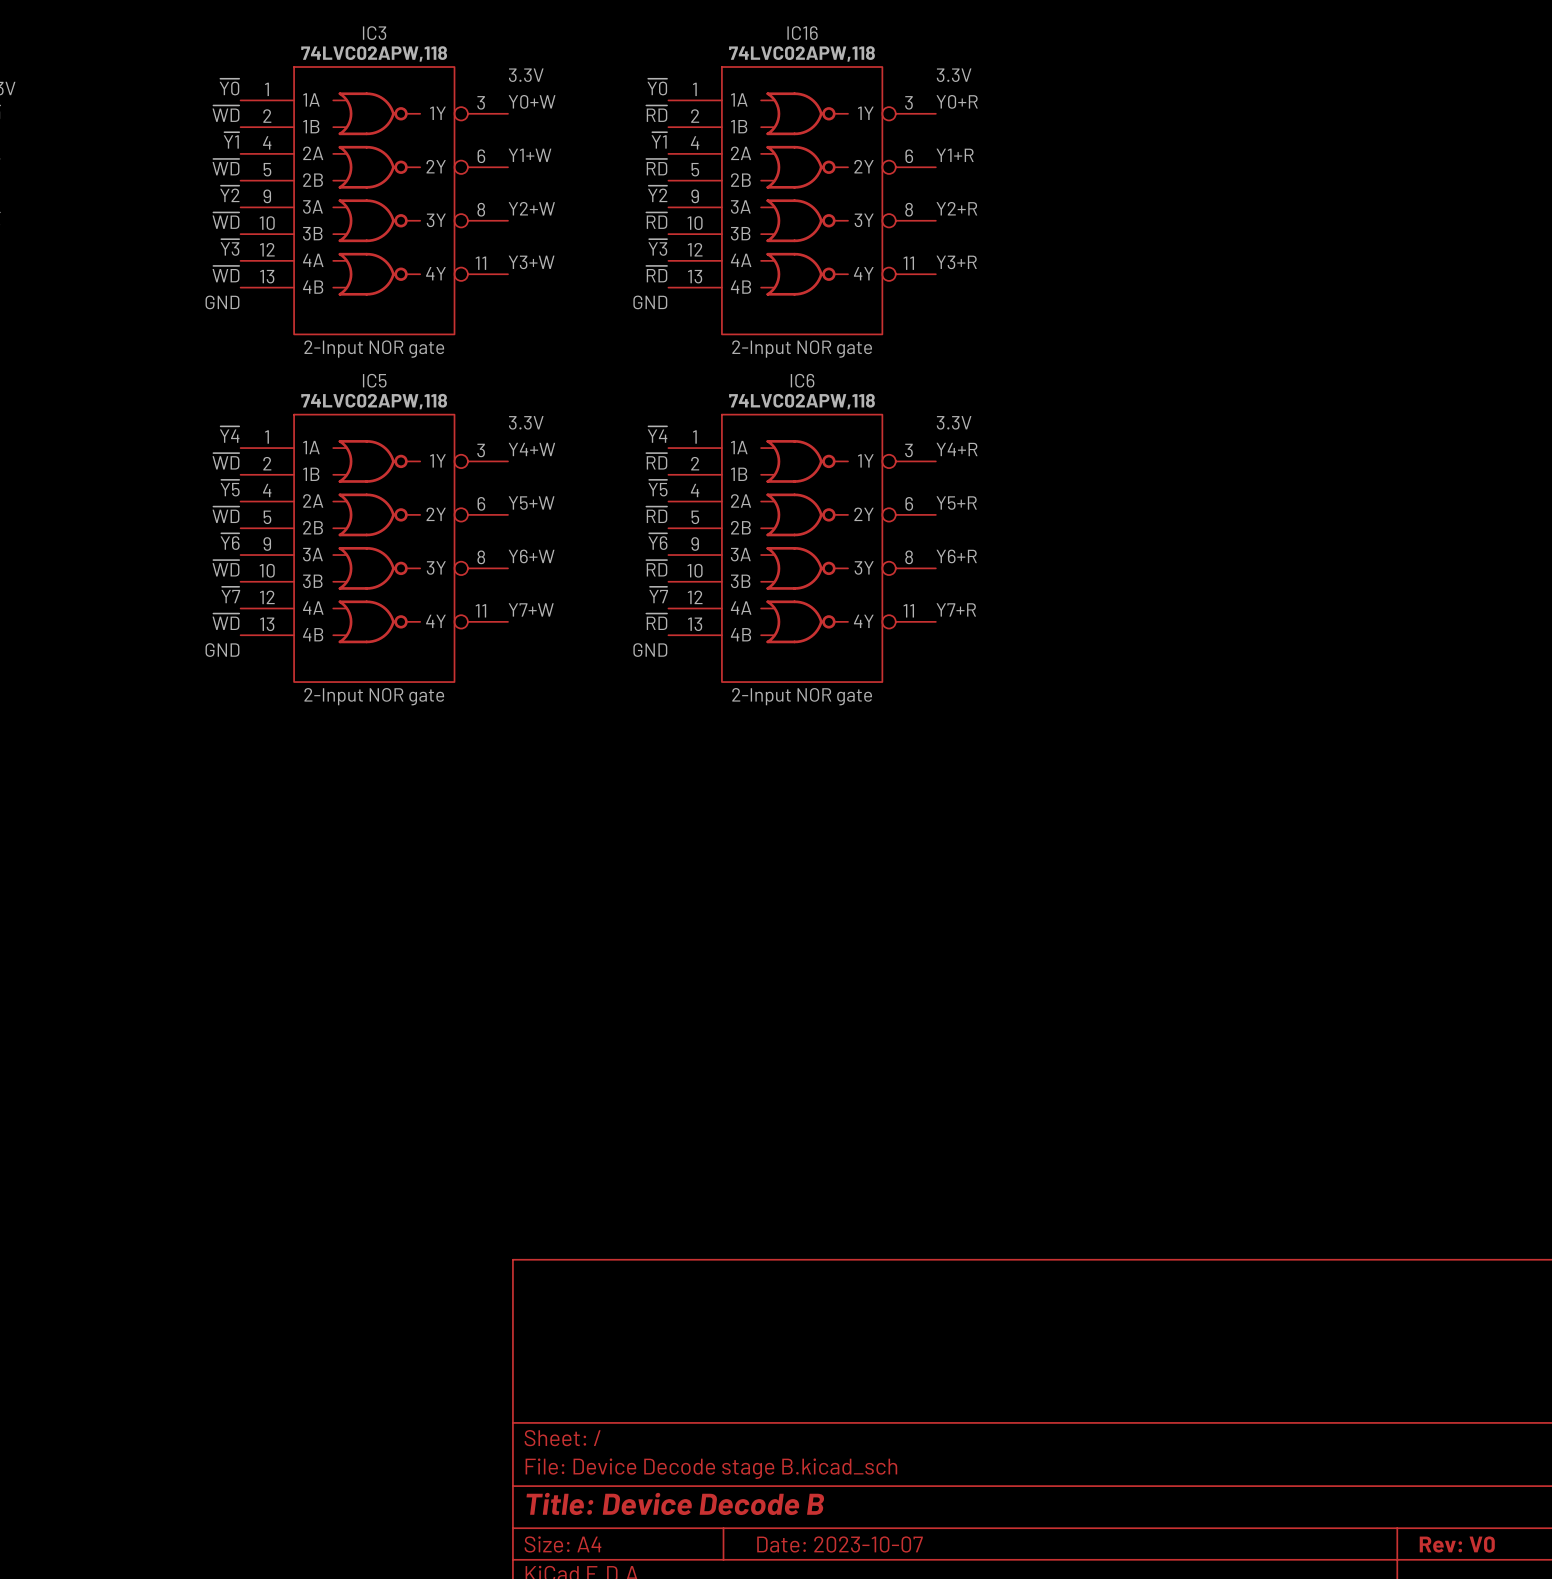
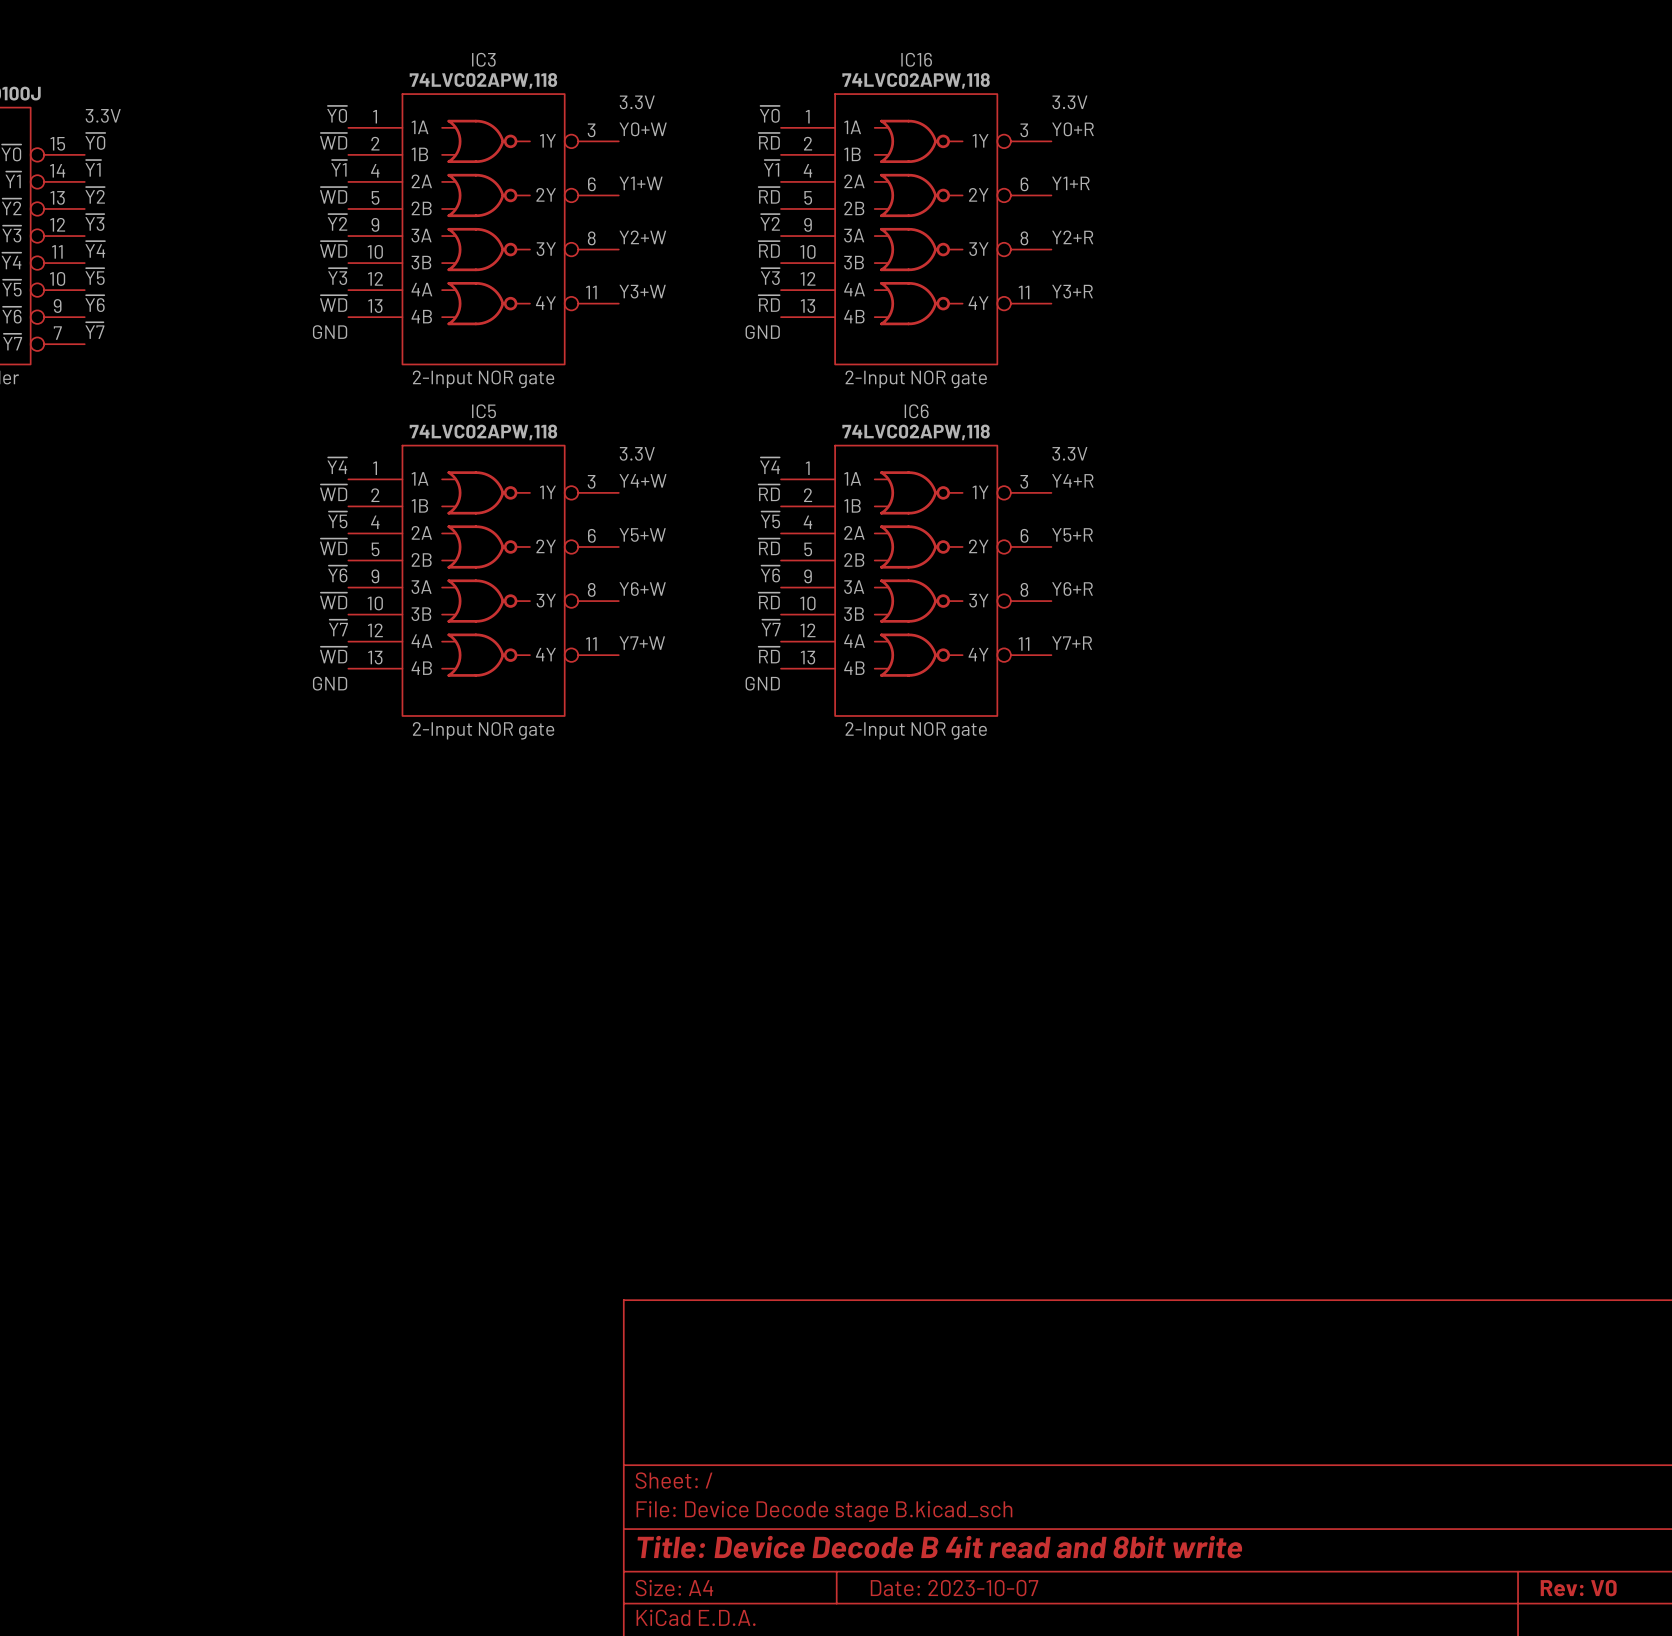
title block: Title: Device Decode B (675, 1503) -> Title: Device Decode B 4it read and 8bit write (939, 1547)

